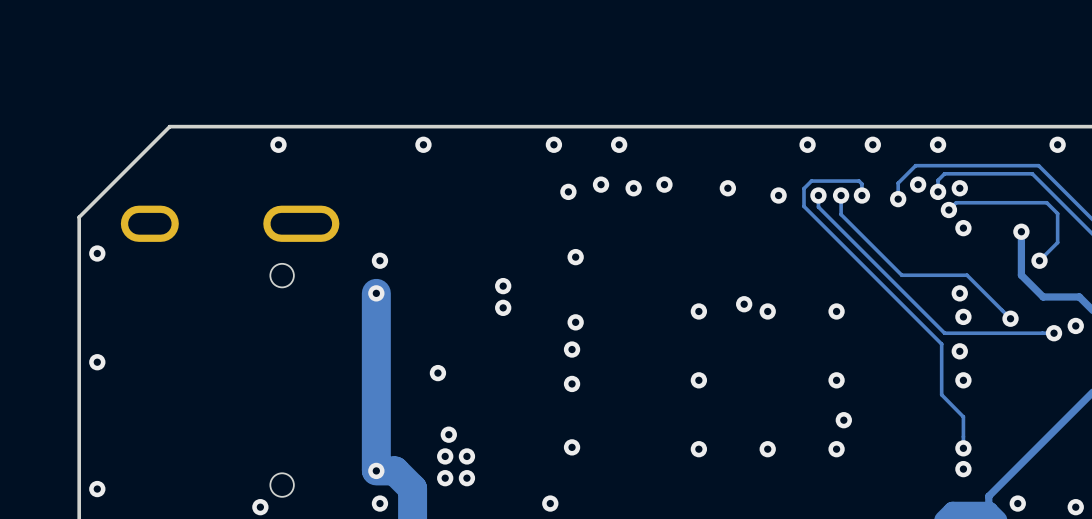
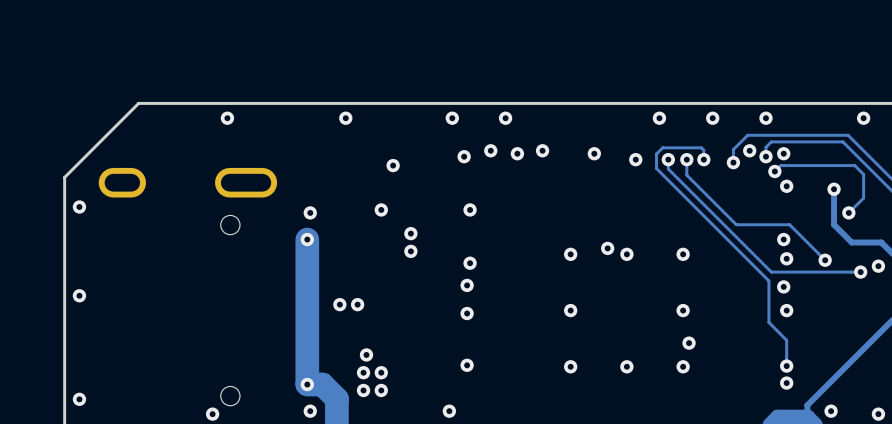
via: none -> (393, 165)
via: none -> (381, 209)
via: none -> (339, 304)

